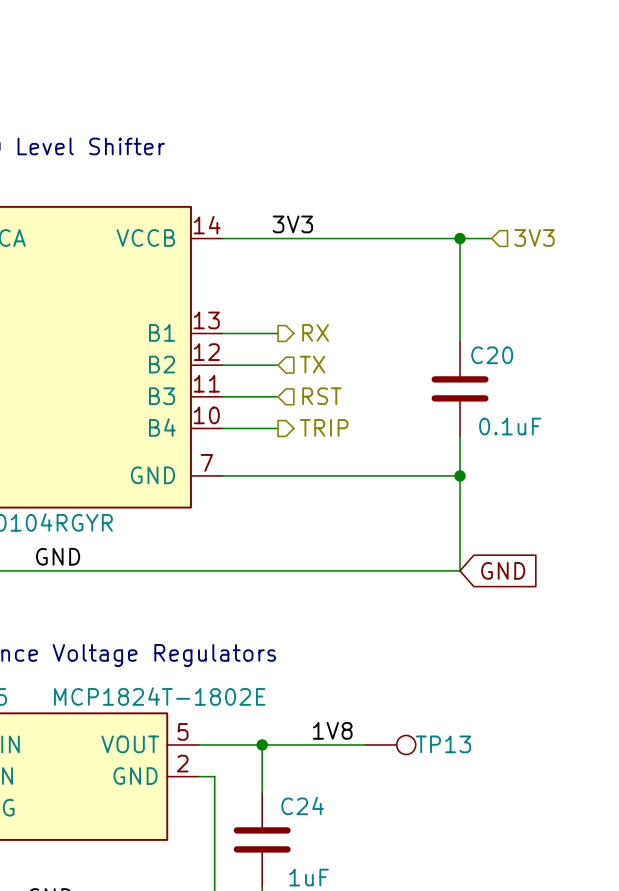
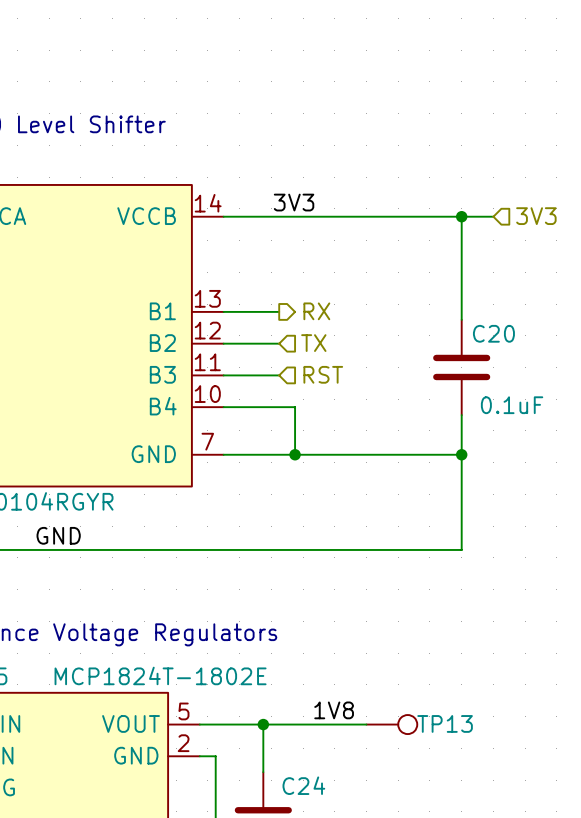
hierarchical label: TRIP (324, 427) -> none
wire: none -> (279, 407) (295, 407) (295, 454)
junction: none -> (295, 454)
global label: GND (503, 570) -> none

